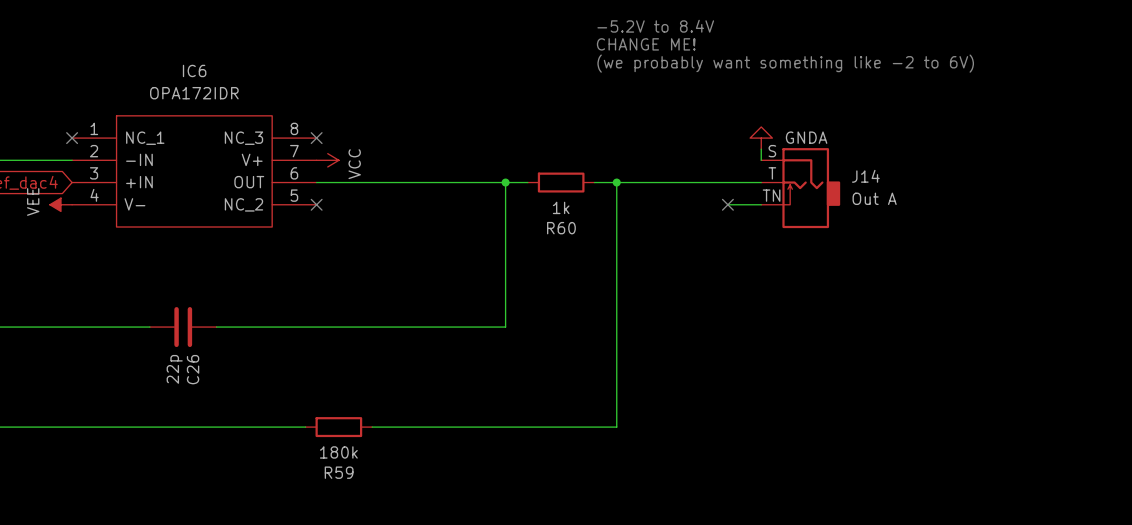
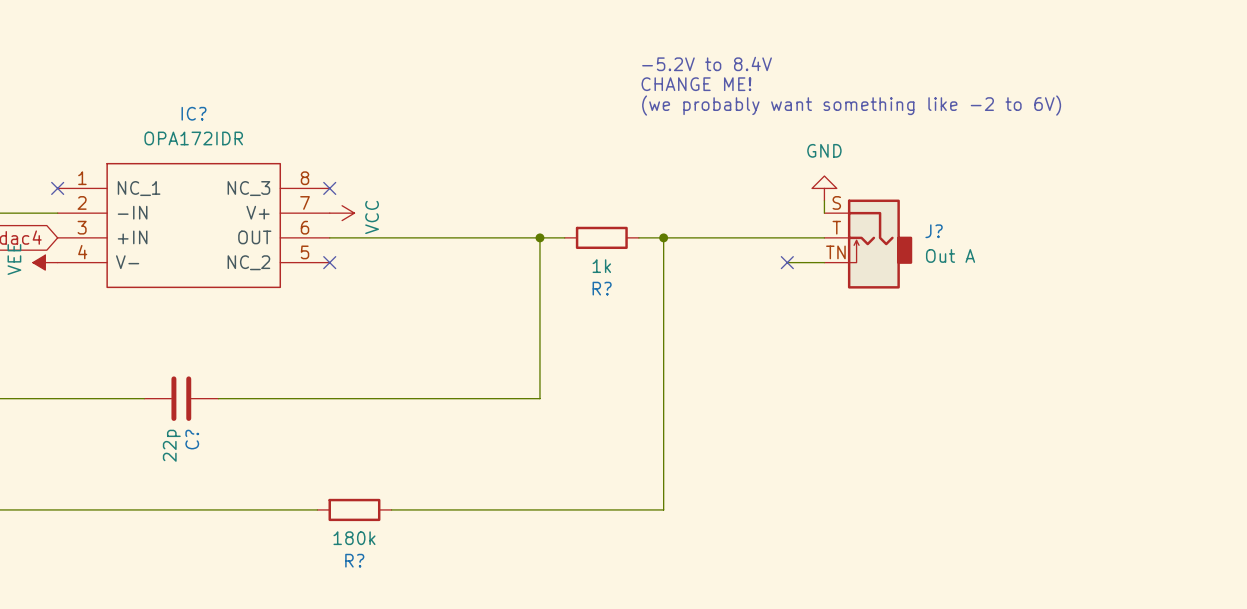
IC6 name: IC6 (194, 70) -> IC? (193, 113)
power symbol: GNDA (761, 138) -> GND (824, 188)
J14 name: J14 (865, 176) -> J? (934, 231)
R60 name: R60 (561, 228) -> R? (602, 288)
C26 name: C26 (193, 369) -> C? (192, 439)
R59 name: R59 (339, 472) -> R? (354, 560)

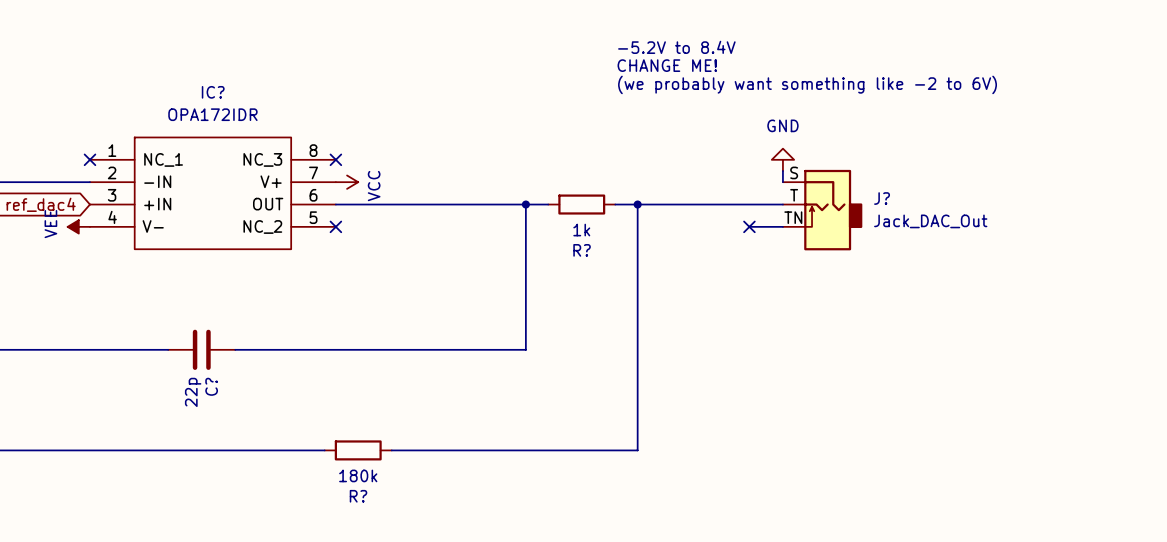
J? value: Out A (950, 255) -> Jack_DAC_Out (930, 221)

